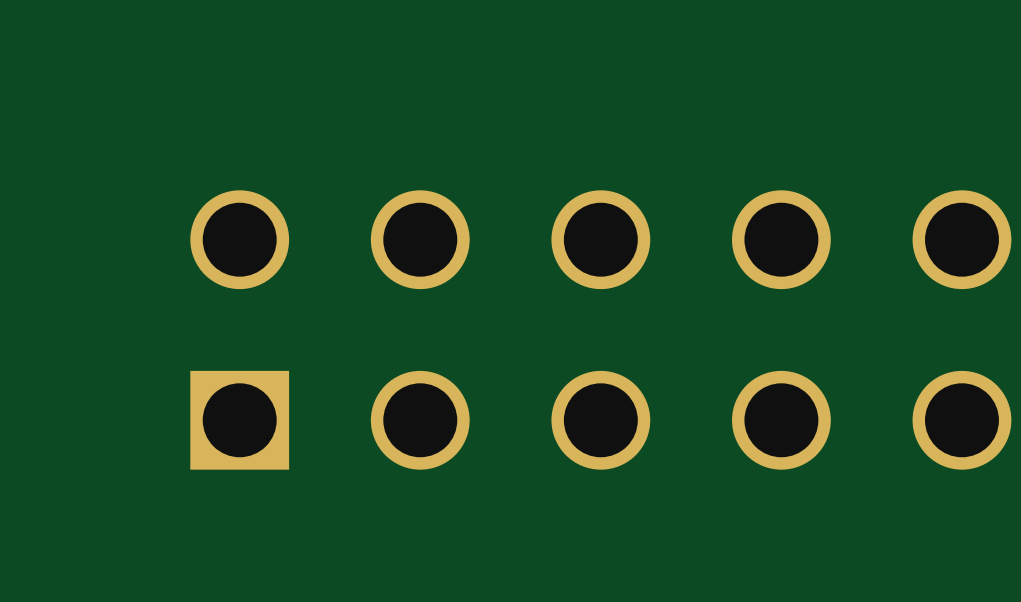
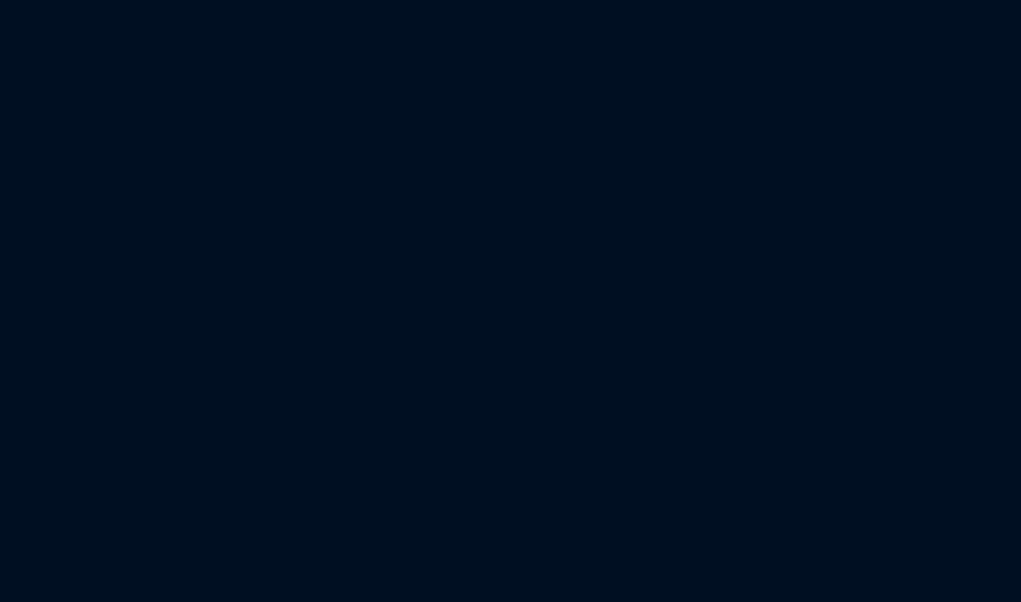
part: (600, 329) -> none

